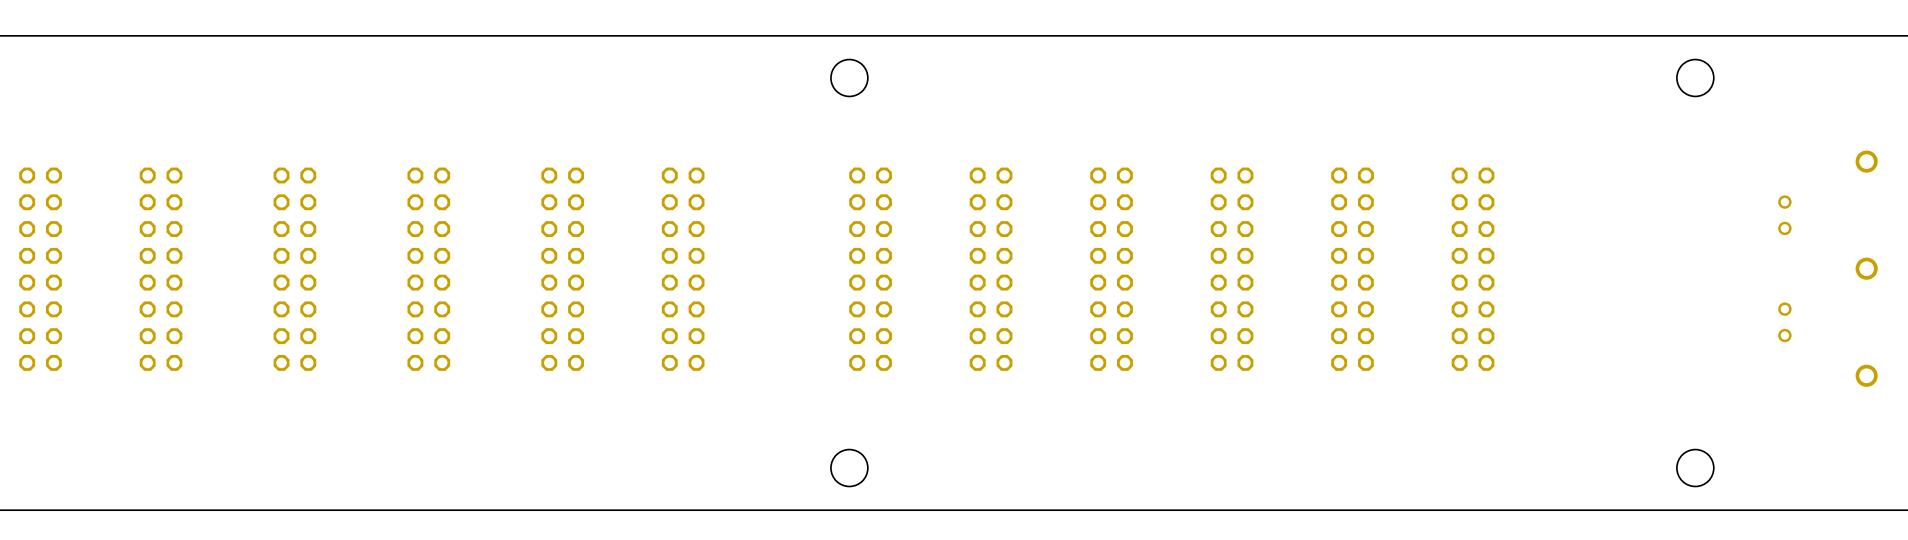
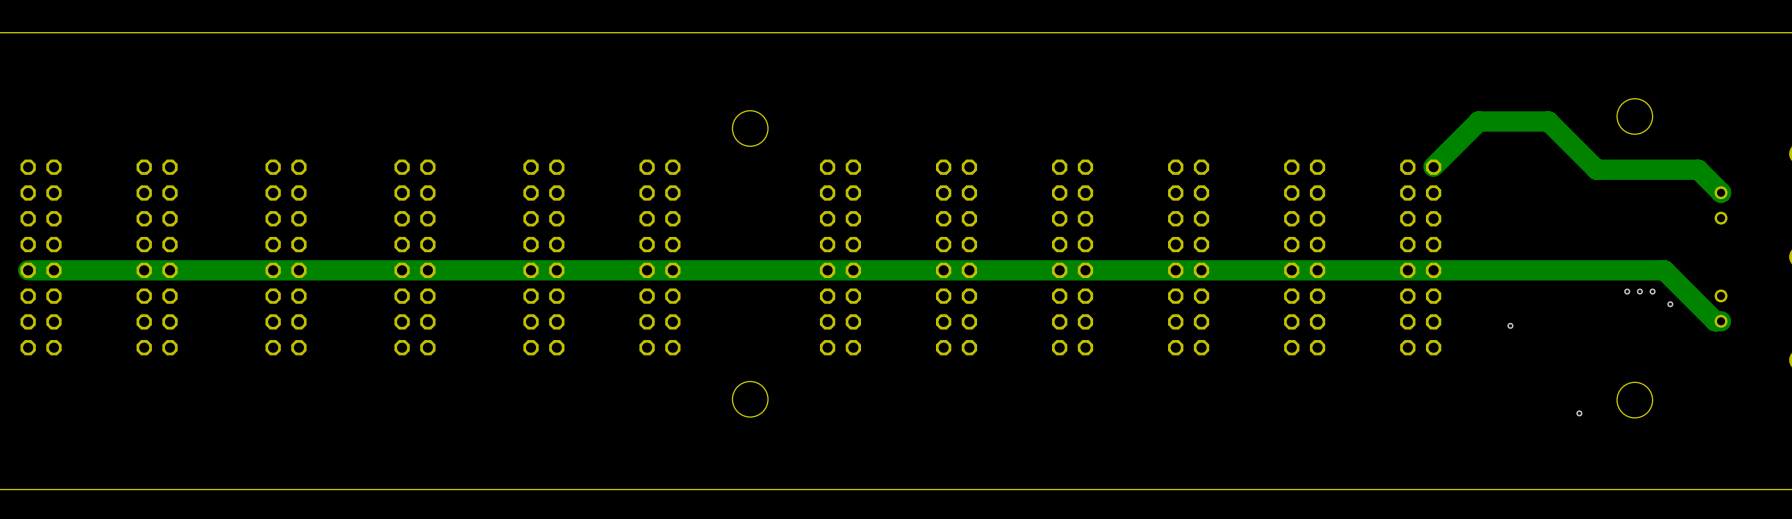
round board edge position: (849, 77) -> (750, 128)
round board edge position: (1695, 77) -> (1634, 116)
track: none -> (1433, 166) (1478, 121) (1548, 121) (1596, 169) (1698, 169) (1721, 192)
track: none -> (28, 270) (1664, 270) (1715, 321) (1721, 321)
via: none -> (1627, 291)
via: none -> (1639, 291)
via: none -> (1652, 291)
via: none -> (1670, 304)
via: none -> (1510, 325)
via: none -> (1579, 413)
round board edge position: (849, 468) -> (750, 399)
round board edge position: (1695, 468) -> (1634, 400)

